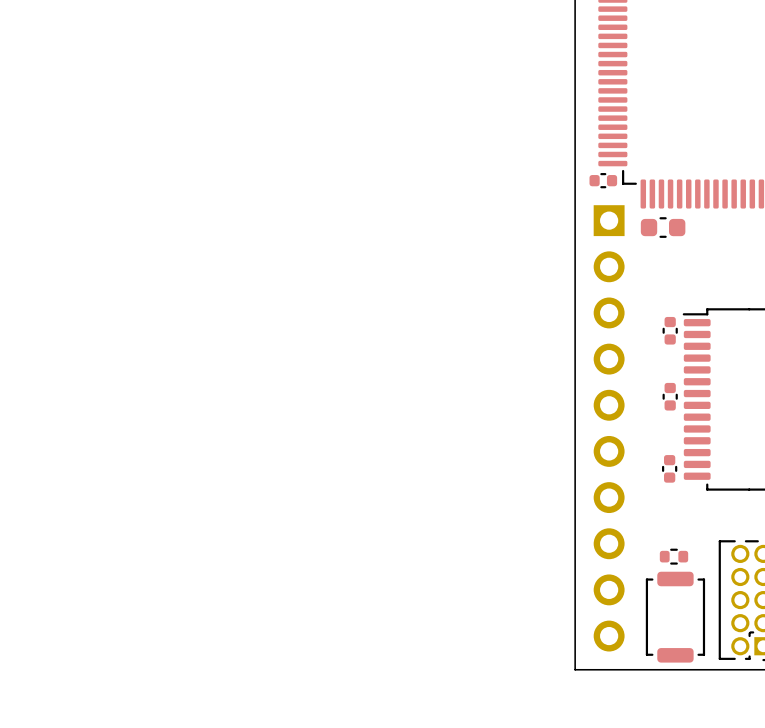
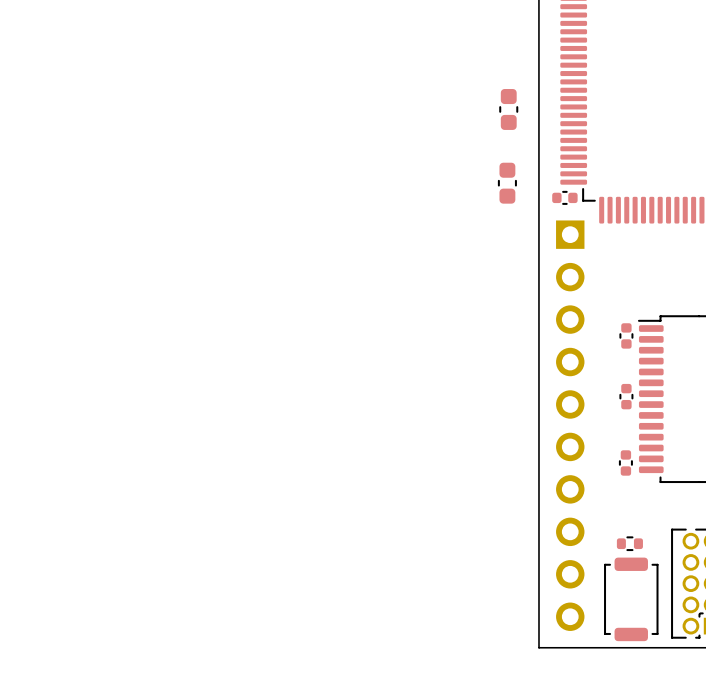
part: none -> (508, 109)
part: none -> (507, 183)
part: (663, 227) -> none

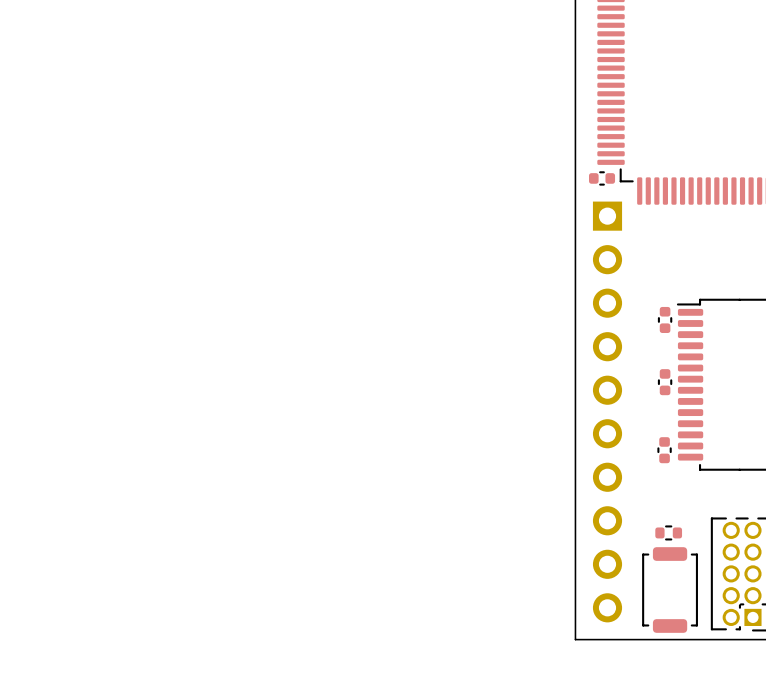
part: (508, 109) -> none
part: (507, 183) -> none

